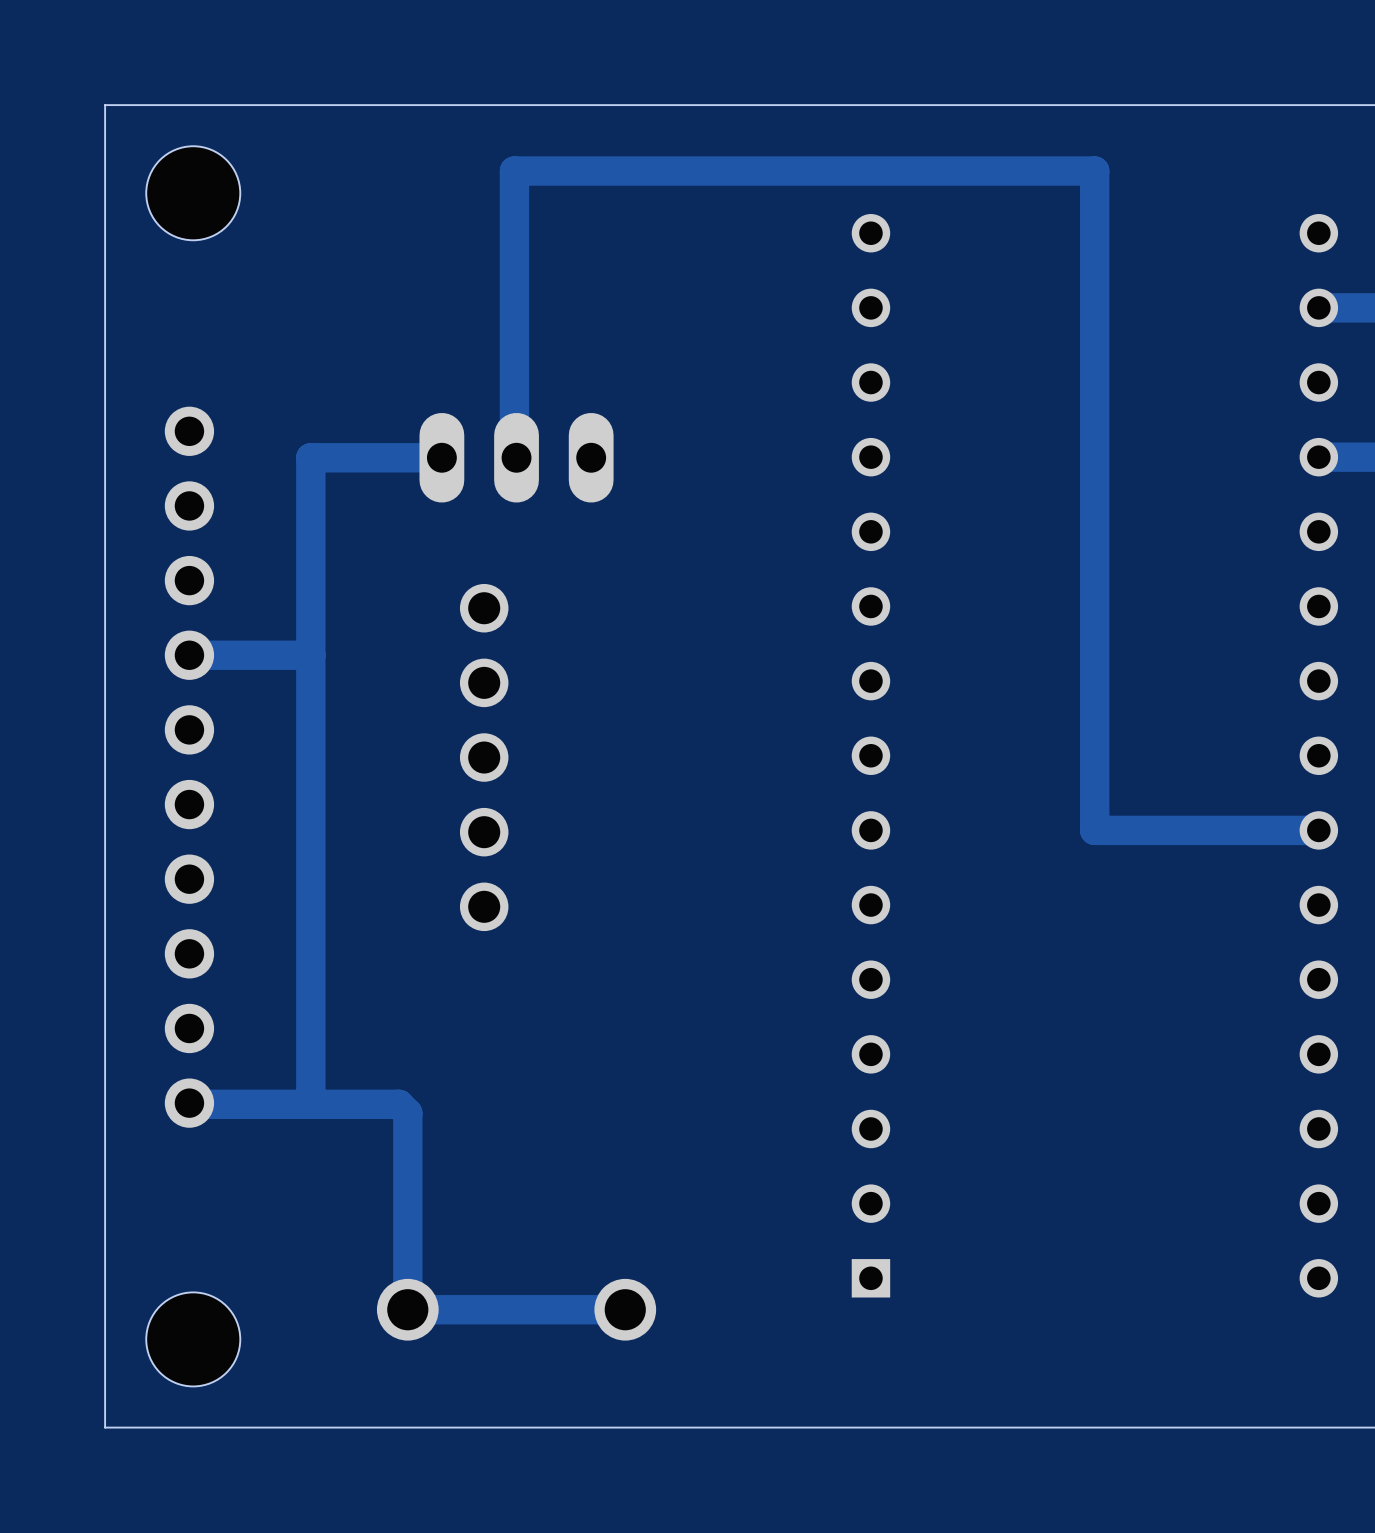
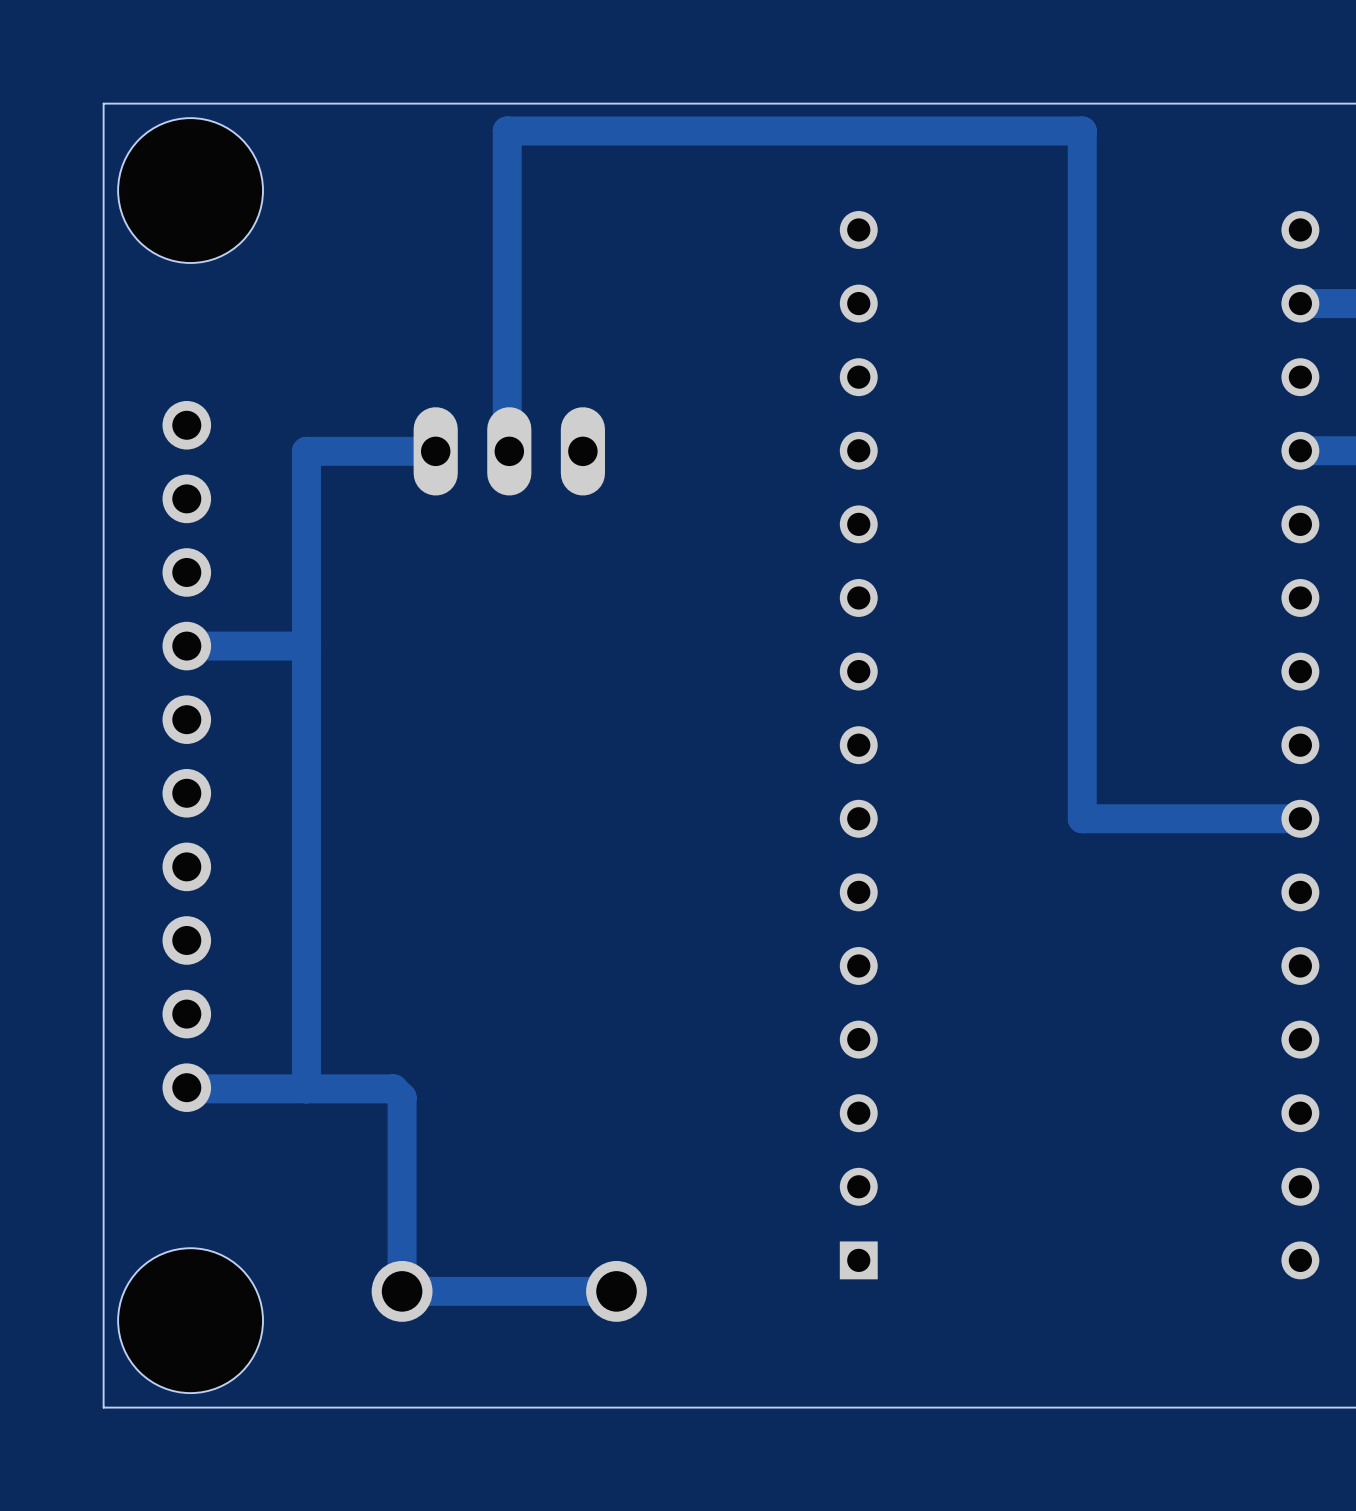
hole size: [146, 146, 241, 241] -> [118, 118, 264, 264]
track: (514, 171) (1094, 171) (1094, 830) (1097, 830) -> (507, 168) (507, 130) (1082, 130) (1082, 818)
part: (484, 757) -> none
hole size: [146, 1292, 241, 1387] -> [118, 1248, 264, 1394]

